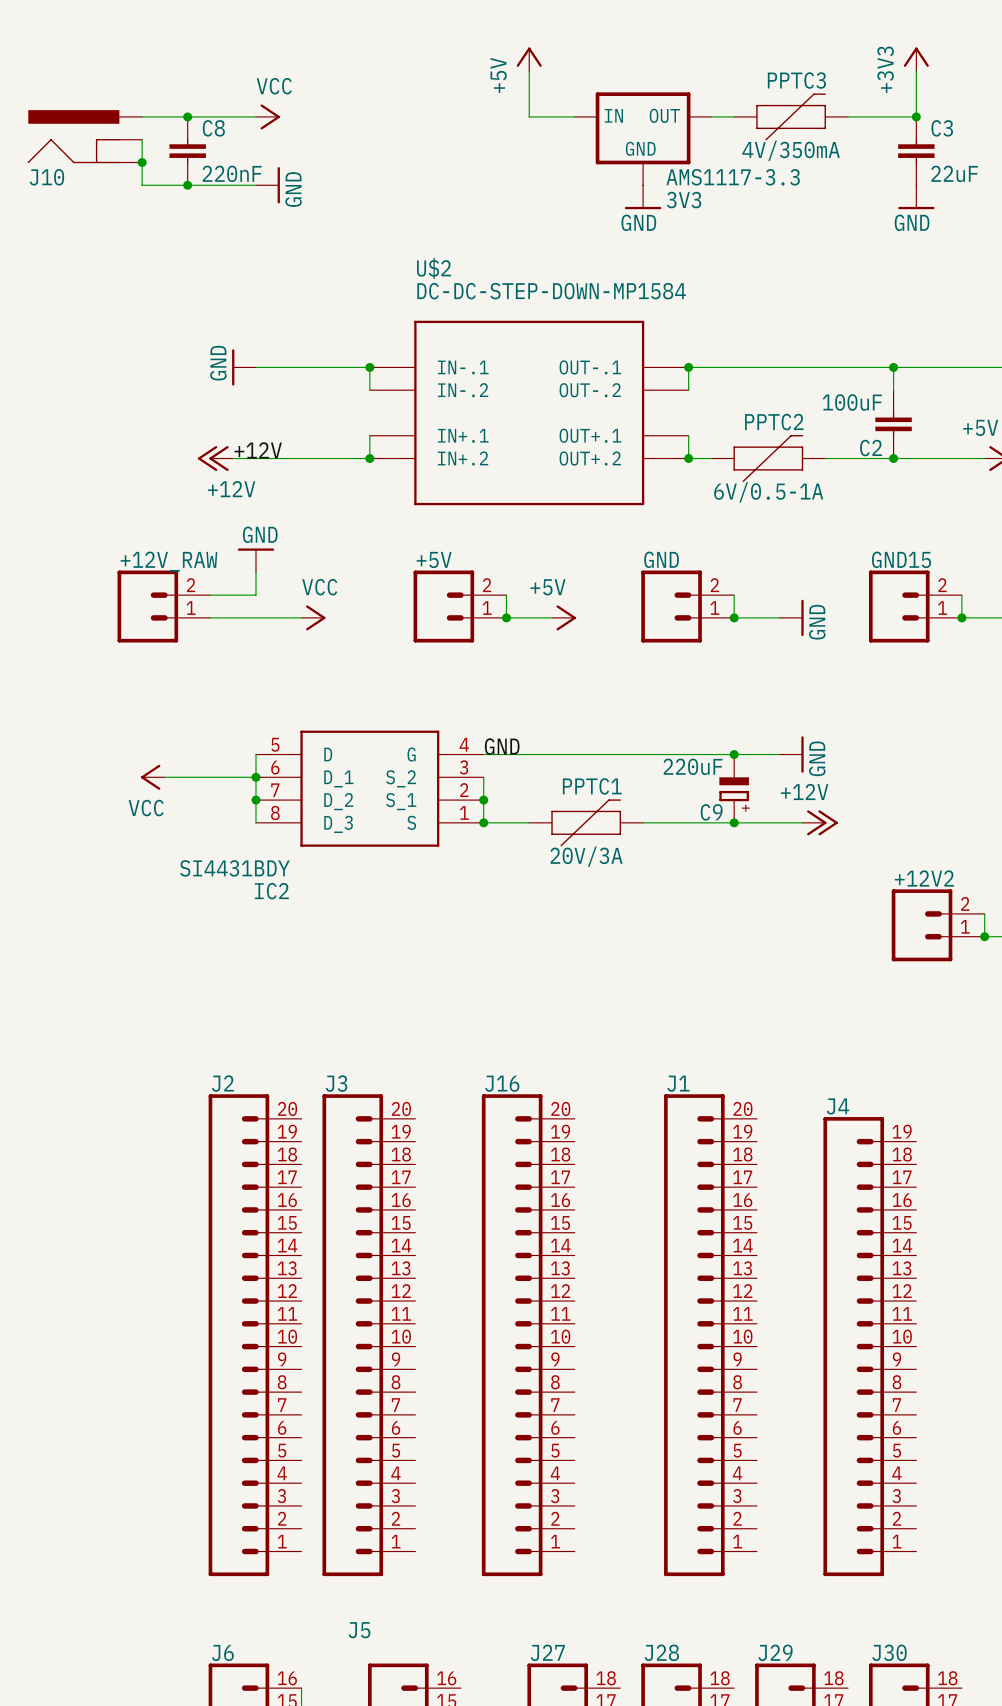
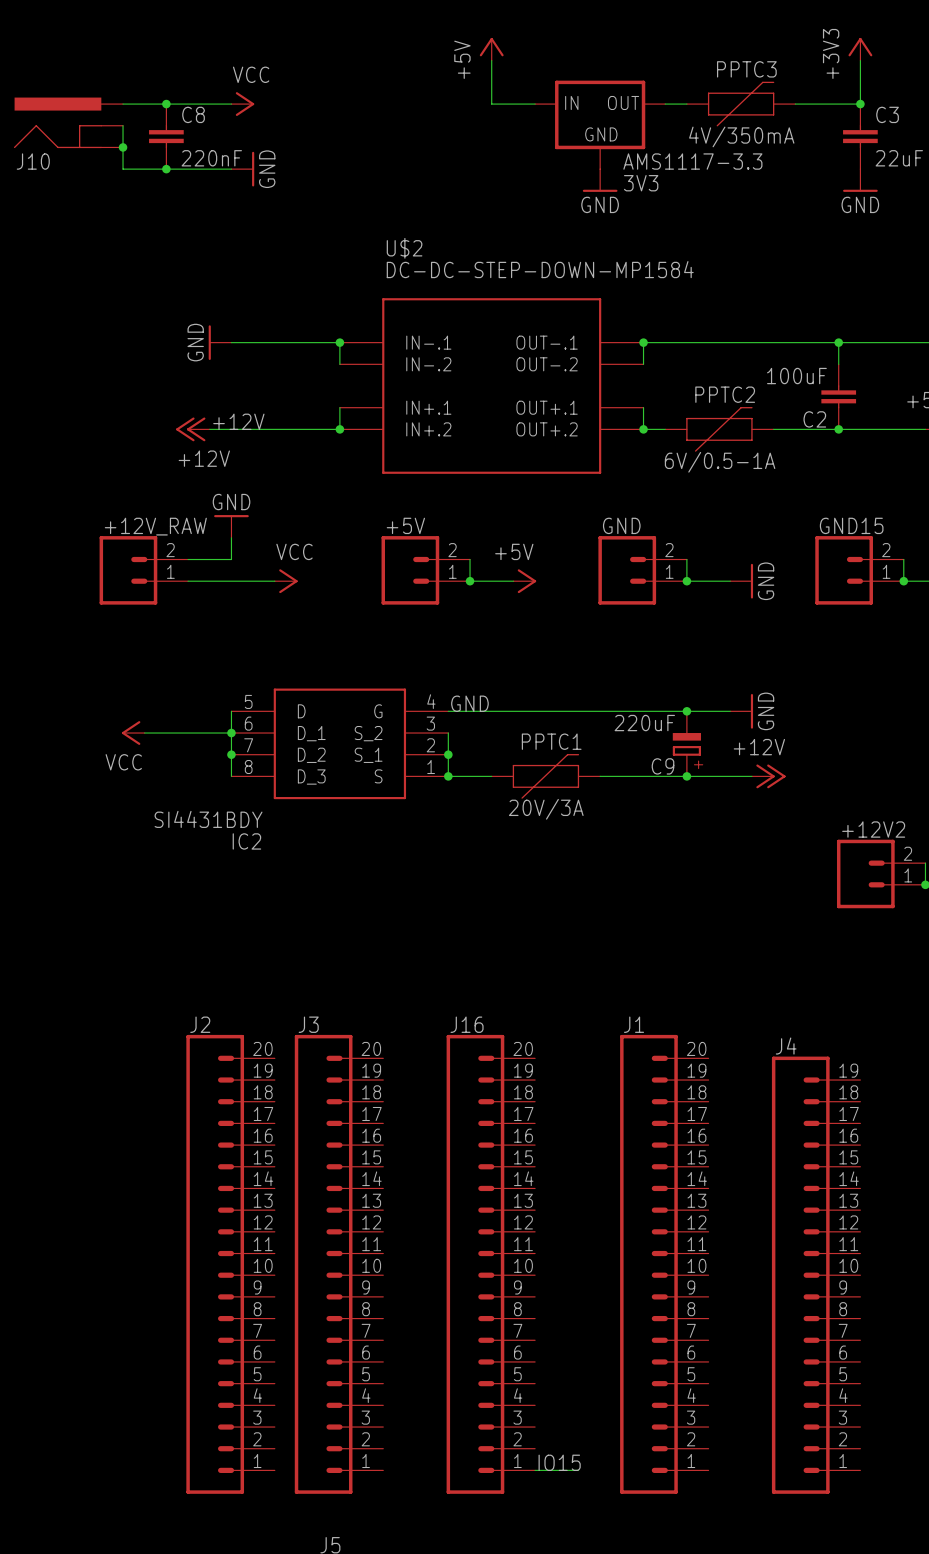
label: none -> IO15 (559, 1462)
wire: none -> (535, 1470) (578, 1470)

